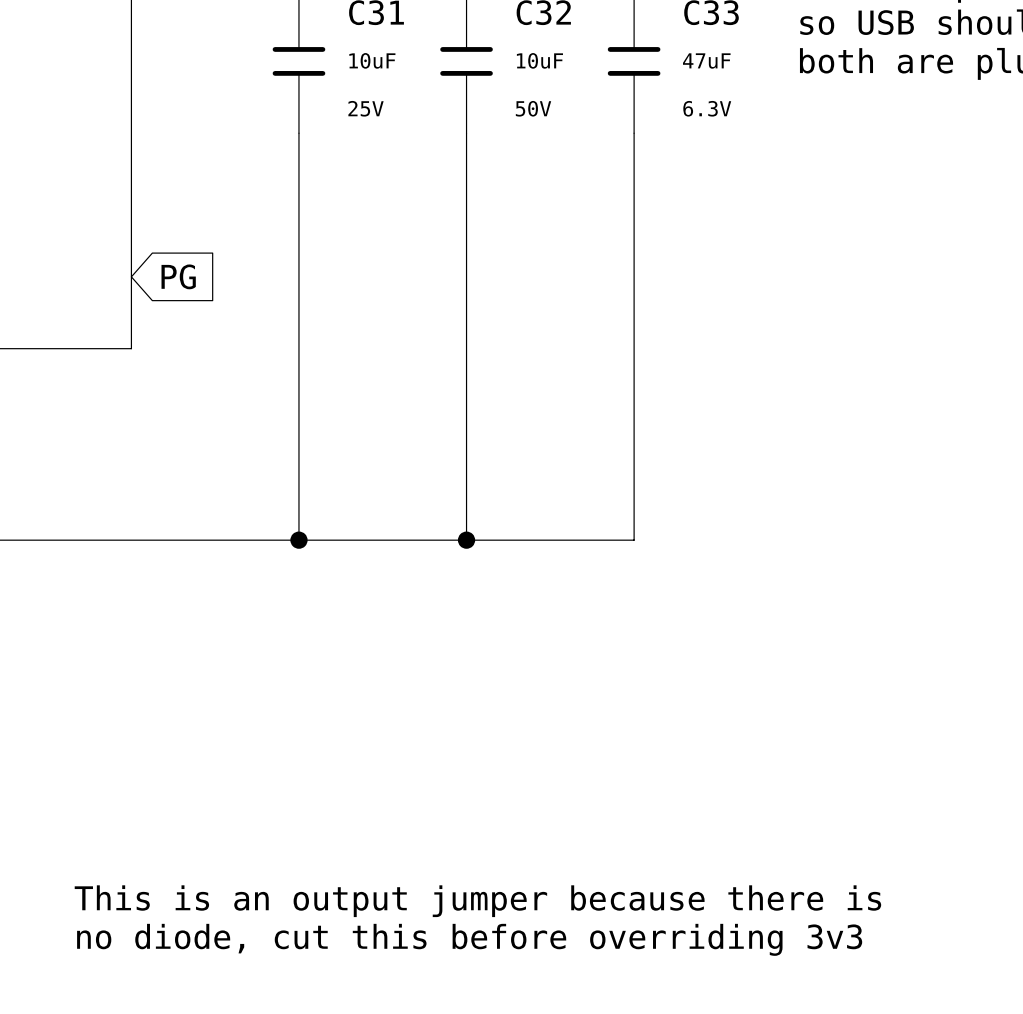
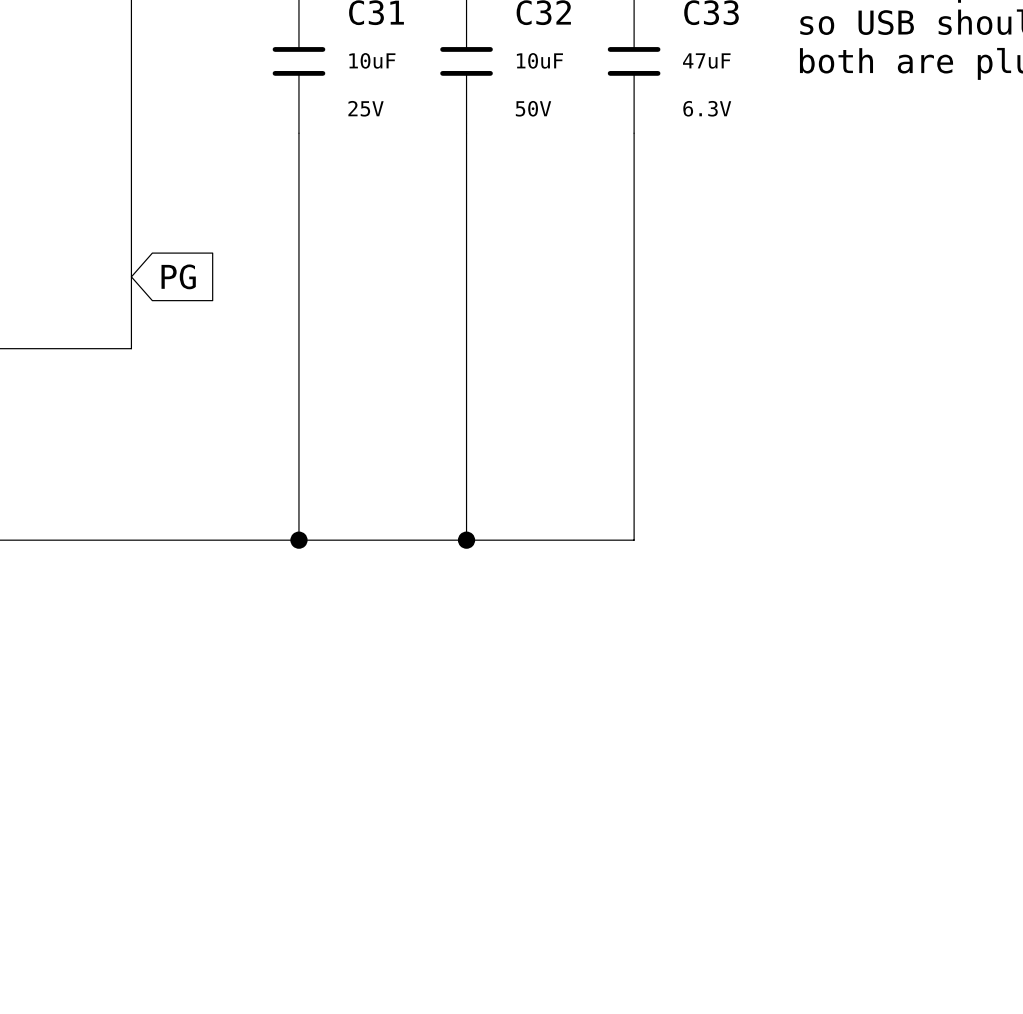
text: This is an output jumper because there is (477, 901) -> none
text: no diode, cut this before overriding 3v3 (469, 939) -> none

